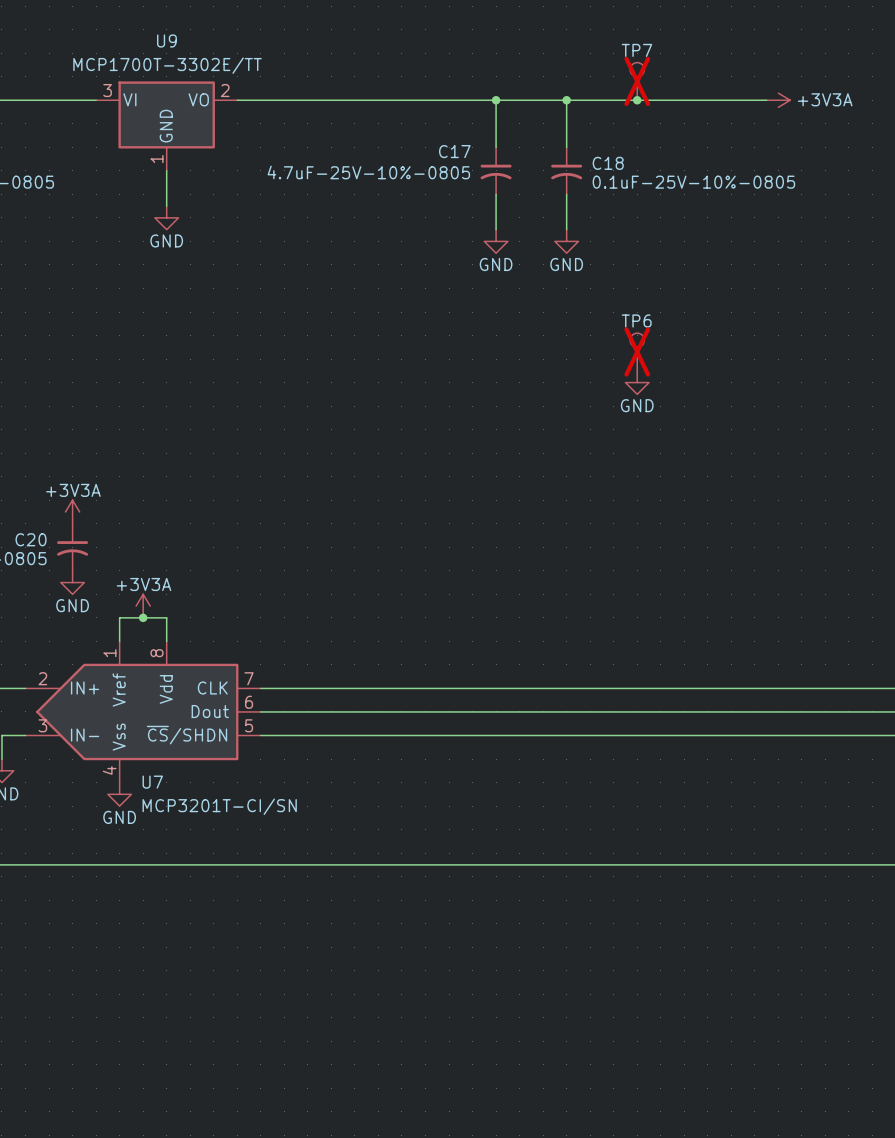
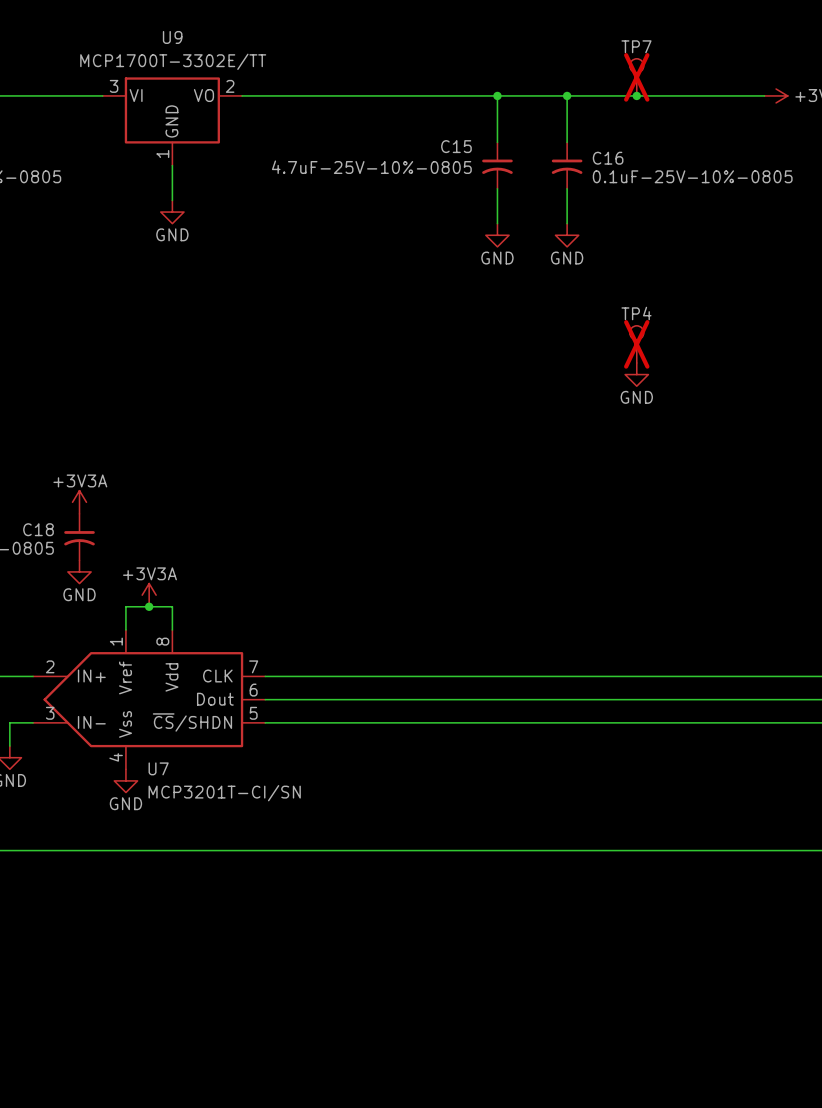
C17 name: C17 (454, 151) -> C15 (456, 146)
C18 name: C18 (608, 163) -> C16 (608, 158)
TP6 name: TP6 (636, 320) -> TP4 (636, 313)
C20 name: C20 (31, 539) -> C18 (38, 529)

